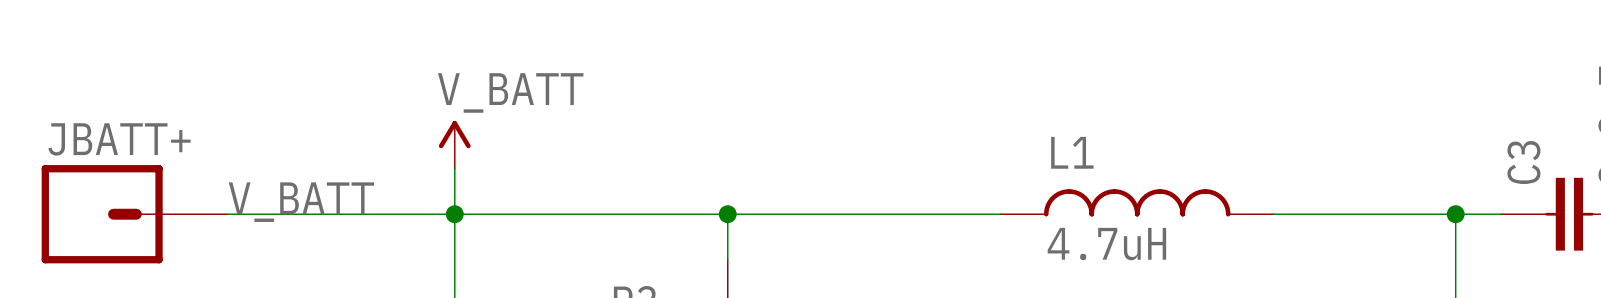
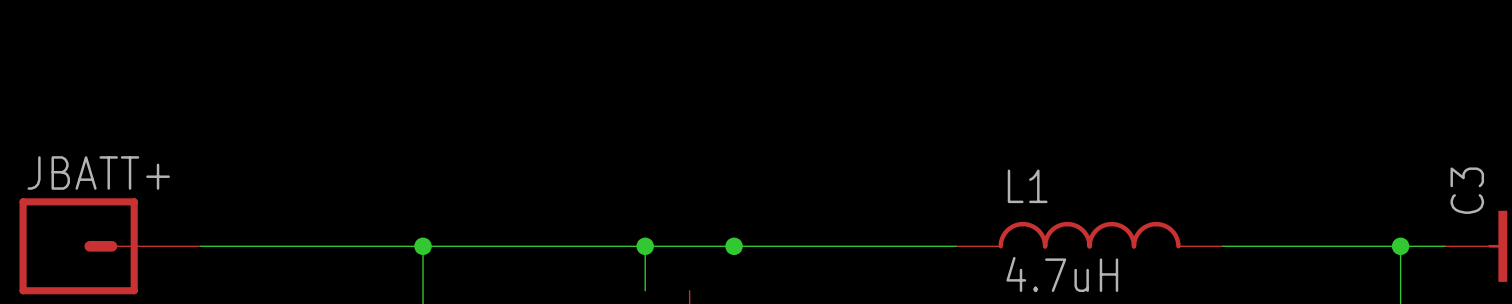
power symbol: V_BATT (454, 144) -> none
wire: (454, 168) (454, 214) -> none
label: V_BATT (301, 202) -> none
junction: none -> (645, 246)
wire: (727, 214) (727, 259) -> (645, 246) (645, 290)
junction: (727, 214) -> none
junction: none -> (734, 246)

